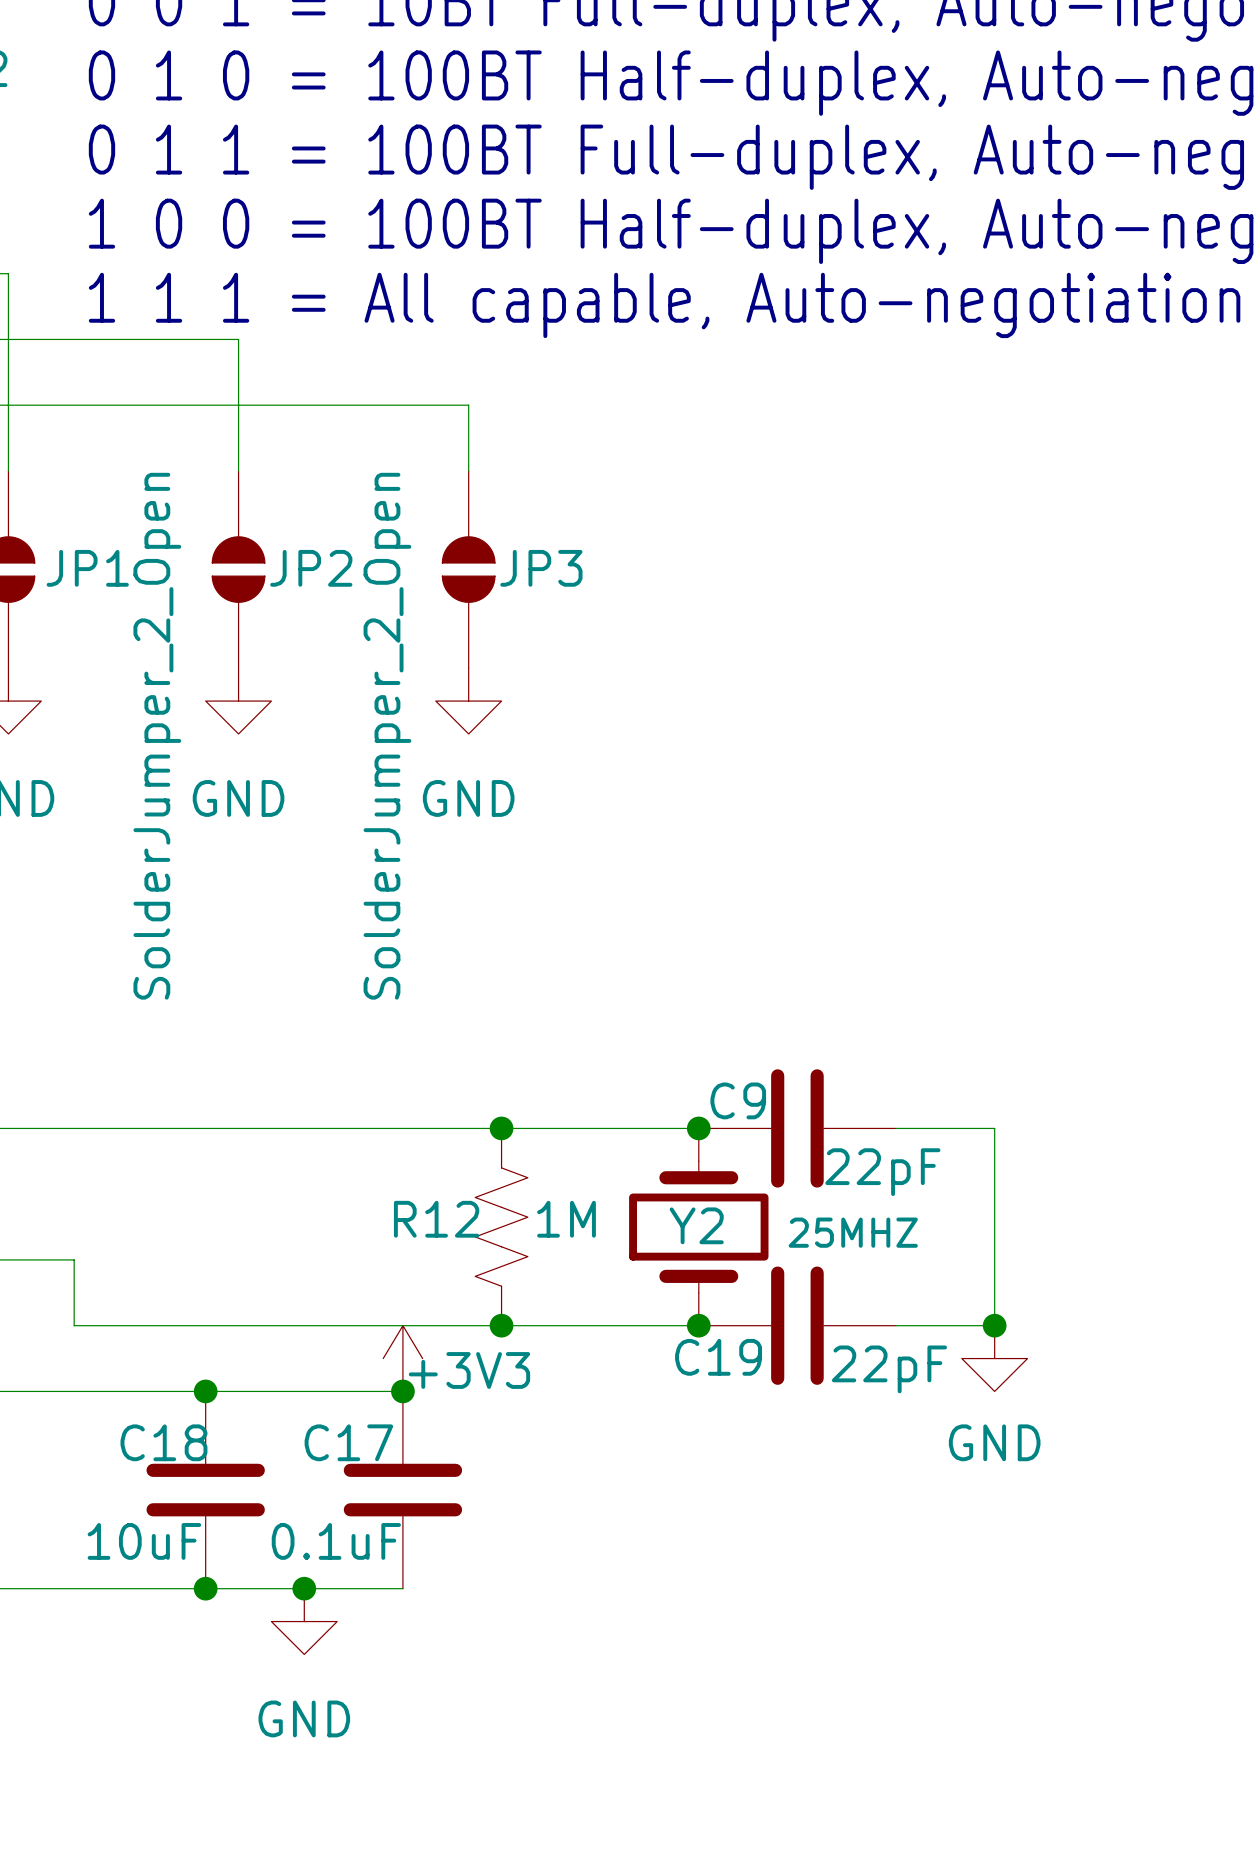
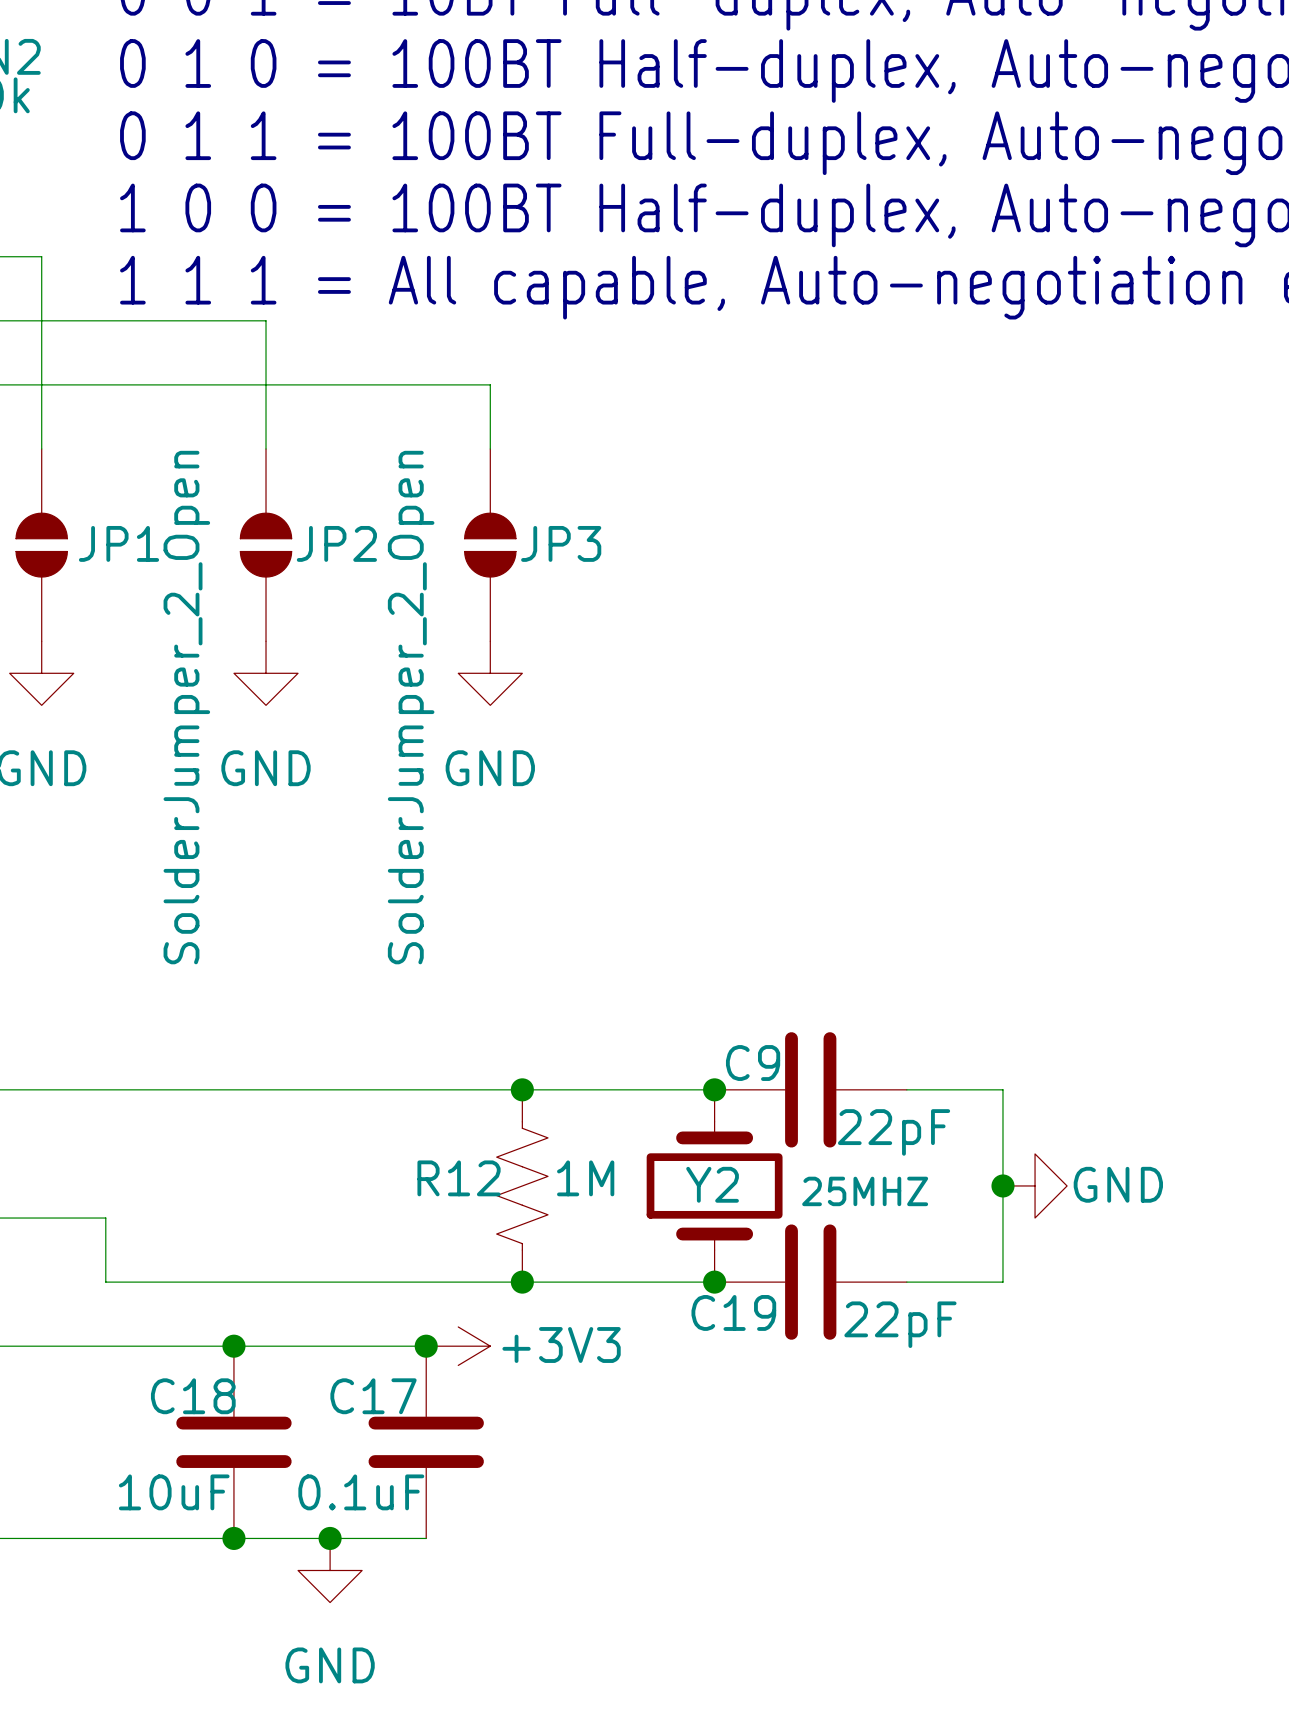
junction position: (994, 1325) -> (1002, 1185)
power symbol rotation: 0° (402, 1358) -> 90° clockwise (458, 1346)
power symbol position: +3V3 (402, 1358) -> +3V3 (458, 1346)
power symbol rotation: 0° (994, 1358) -> 90° counterclockwise (1035, 1185)
power symbol position: GND (994, 1358) -> GND (1035, 1185)

